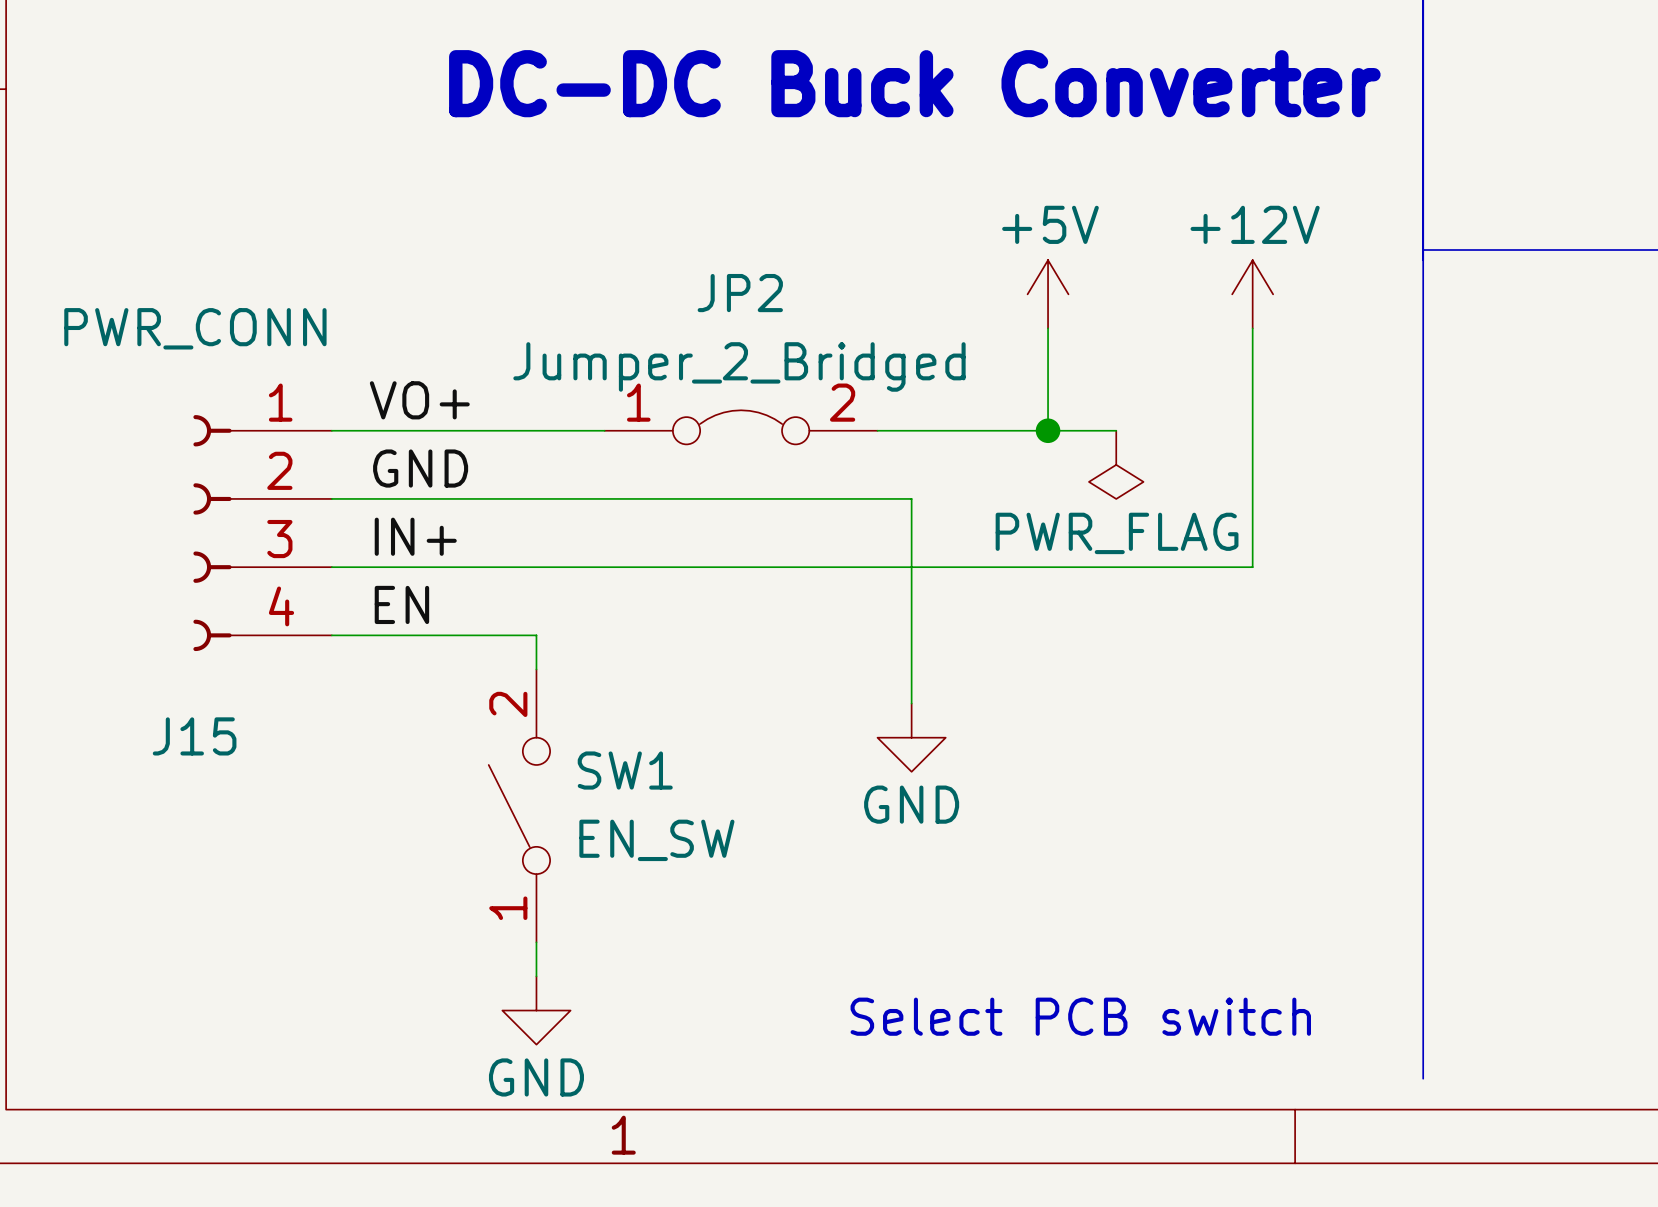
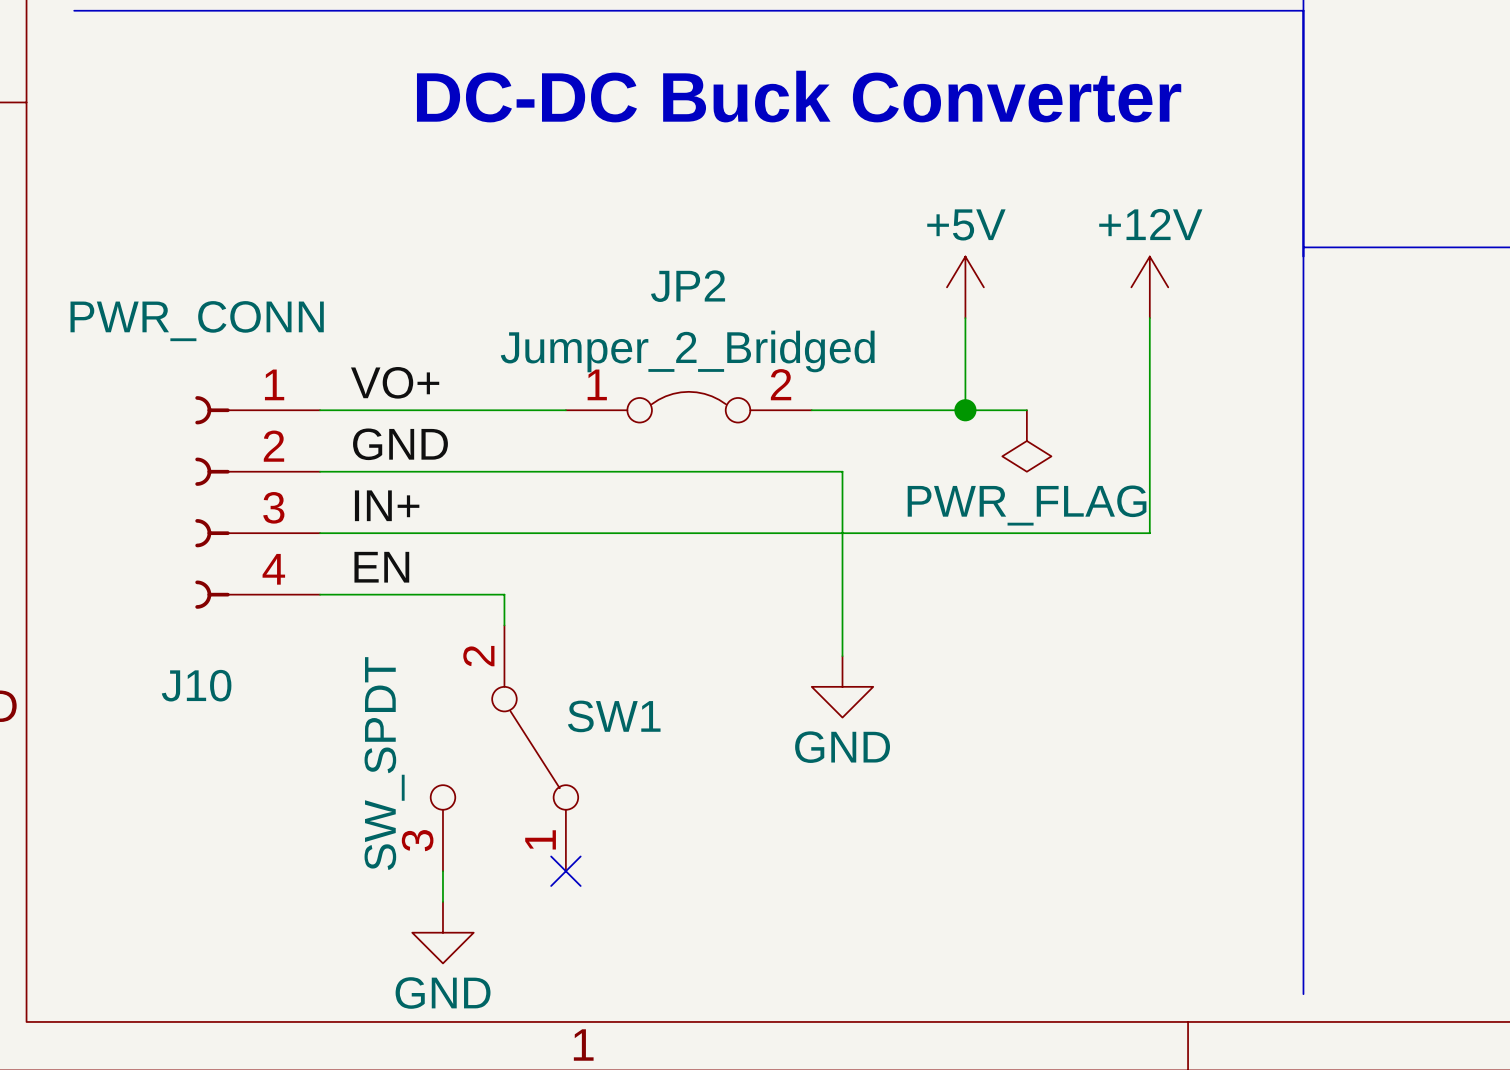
SW1 symbol: [488, 669, 551, 943] -> [430, 625, 579, 872]
J15 name: J15 (194, 736) -> J10 (196, 685)
SW1 value: EN_SW (656, 840) -> SW_SPDT (384, 763)
wire: (536, 942) (536, 976) -> (442, 871) (442, 901)
no-connect mark: none -> (565, 871)
power symbol position: GND (536, 1010) -> GND (442, 932)
text: Select PCB switch (1080, 1016) -> none

